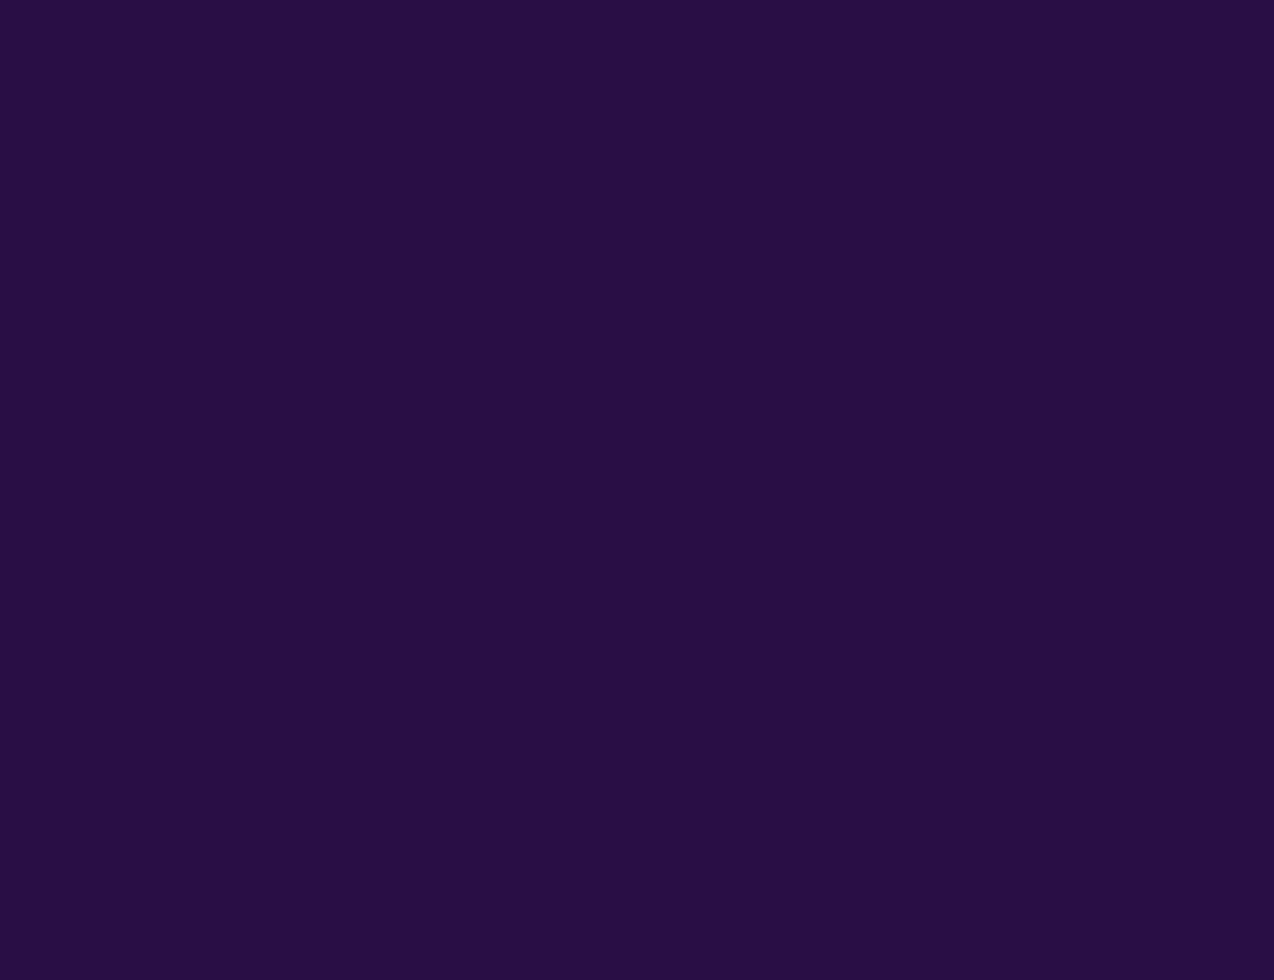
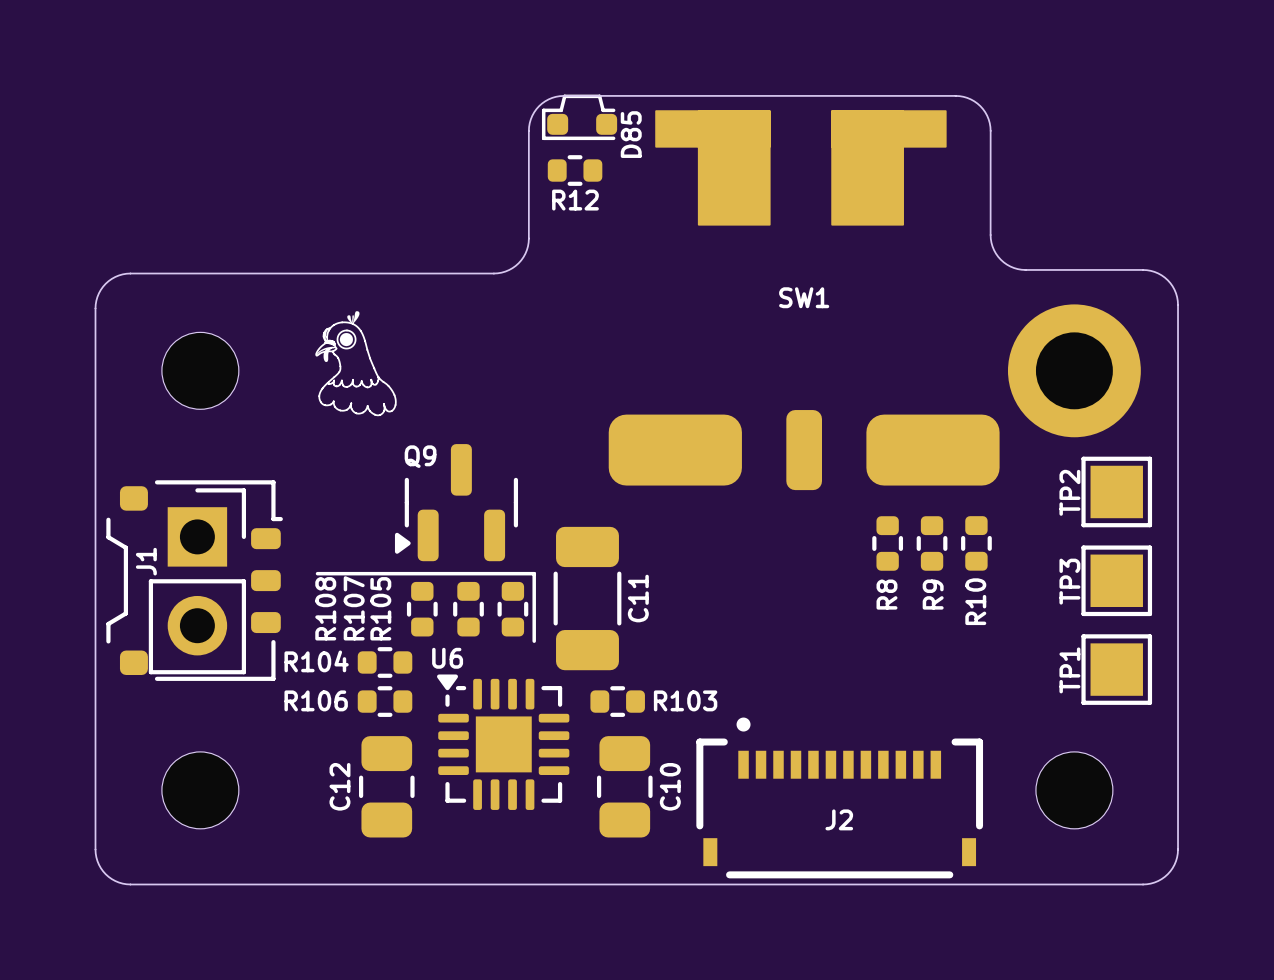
board edge: none -> (563, 95) (955, 95) (967, 97) (983, 109) (989, 123) (990, 238) (994, 250) (1000, 259) (1010, 266) (1021, 269) (1146, 270) (1158, 273) (1170, 283) (1176, 293) (1178, 304) (1178, 849) (1174, 864) (1164, 876) (1154, 882) (1143, 884) (130, 884) (115, 881) (103, 871) (97, 861) (95, 849) (95, 308) (100, 289) (111, 278) (130, 273) (493, 273) (509, 270) (521, 260) (528, 242) (528, 130) (530, 119) (542, 103) (552, 97) (563, 95)
D85: none -> (579, 117)
R12: none -> (575, 170)
SW1: none -> (804, 300)
drawing: none -> [315, 311, 397, 417]
part: none -> (200, 370)
part: none -> (1074, 370)
TP2: none -> (1116, 491)
Q9: none -> (456, 502)
R8: none -> (887, 543)
R9: none -> (932, 543)
R10: none -> (976, 543)
line: none -> (317, 573) (534, 573) (534, 641)
J1: none -> (194, 580)
TP3: none -> (1116, 580)
part: none -> (197, 581)
C11: none -> (587, 598)
R108: none -> (422, 609)
R107: none -> (468, 609)
R105: none -> (512, 609)
R104: none -> (385, 662)
TP1: none -> (1116, 669)
R106: none -> (385, 701)
R103: none -> (617, 701)
U6: none -> (503, 742)
C12: none -> (386, 786)
C10: none -> (624, 786)
part: none -> (200, 790)
part: none -> (1074, 790)
J2: none -> (839, 797)

